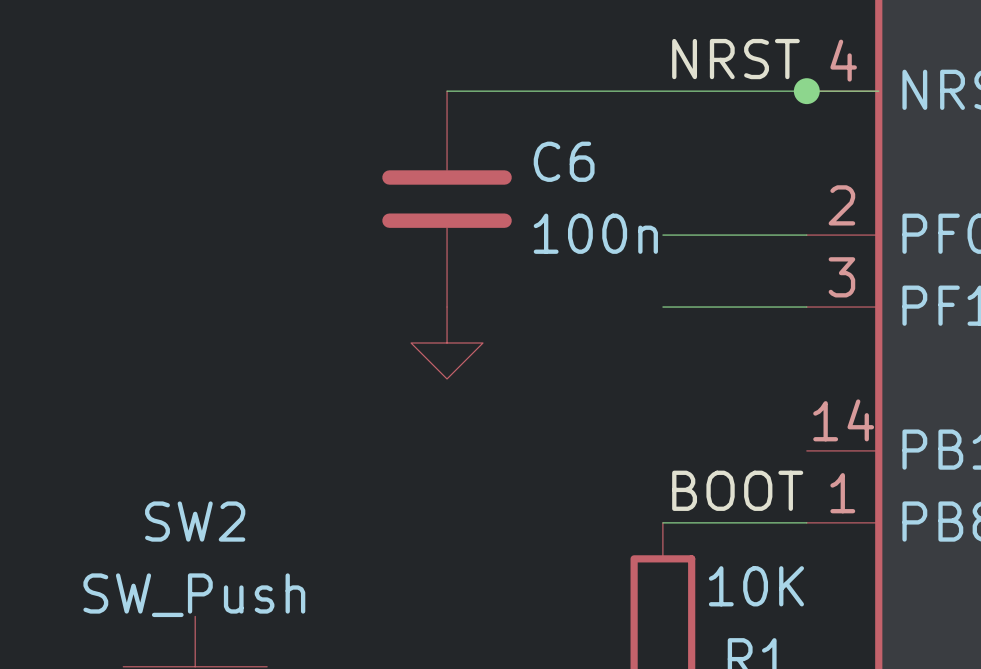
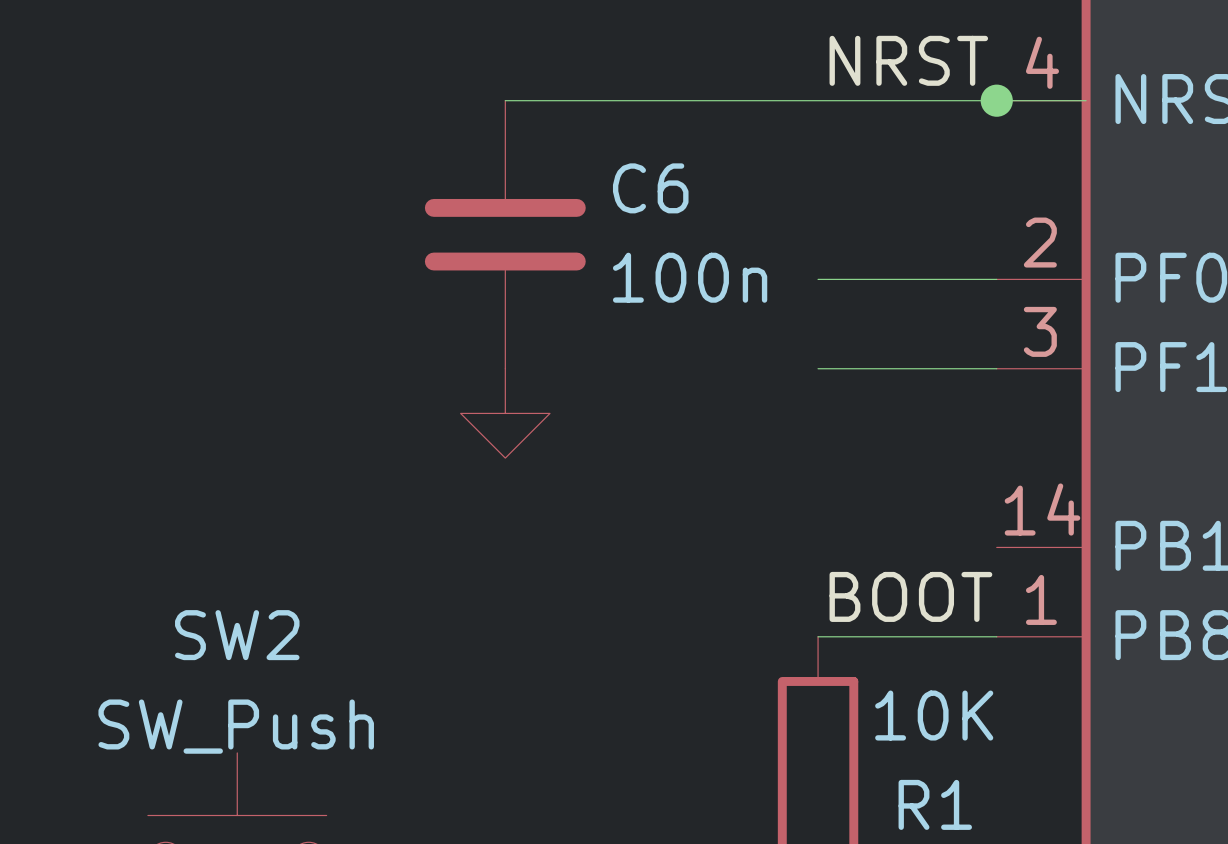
wire: none -> (505, 100) (549, 100)
C6 position: (447, 199) -> (505, 234)
power symbol position: (447, 342) -> (505, 413)

